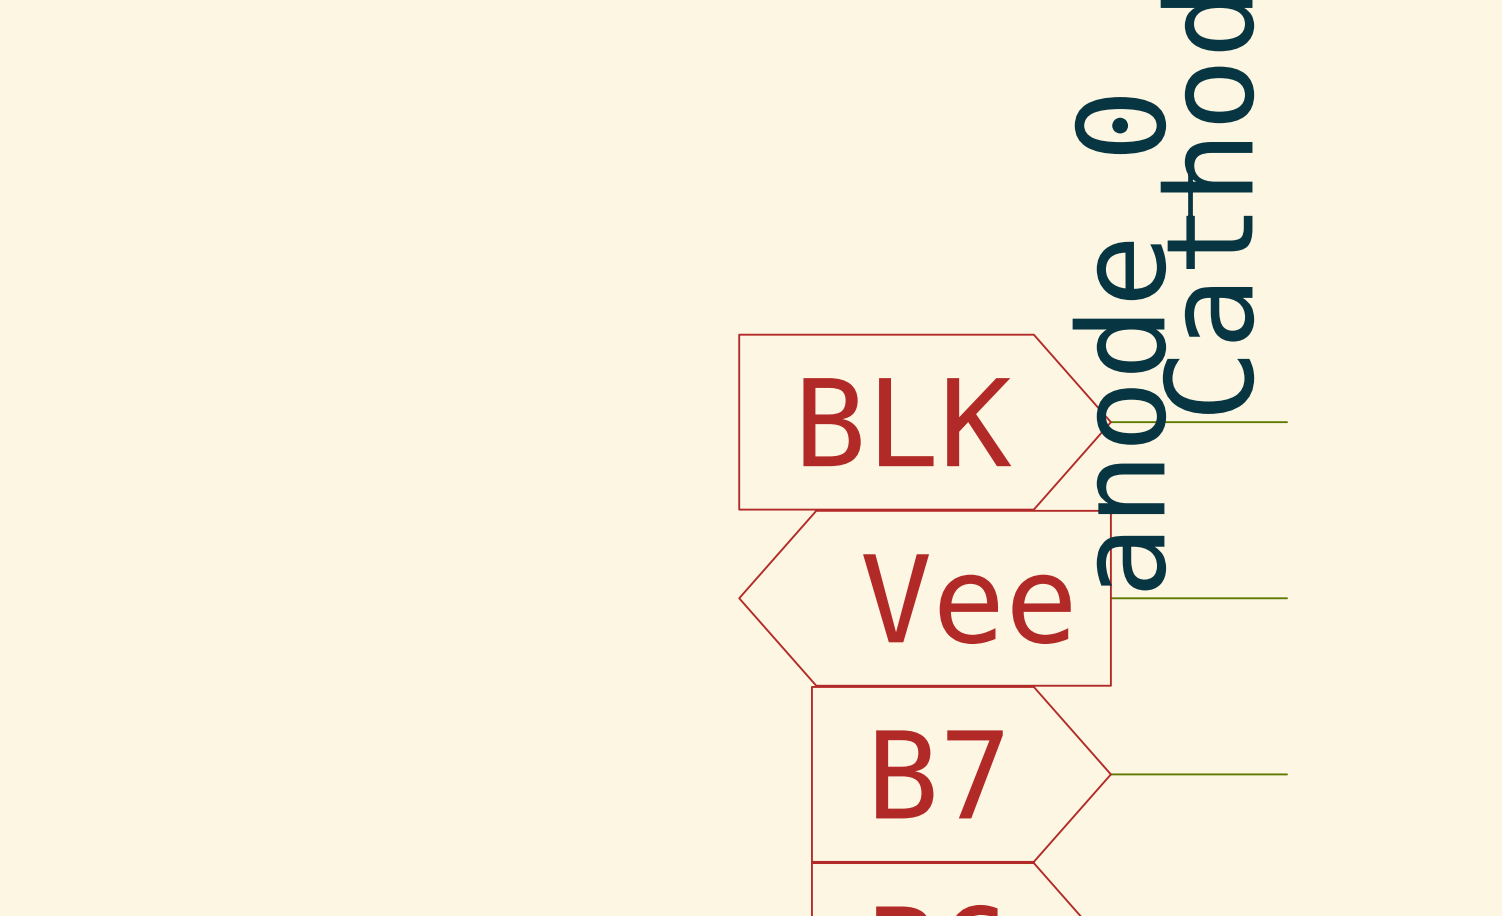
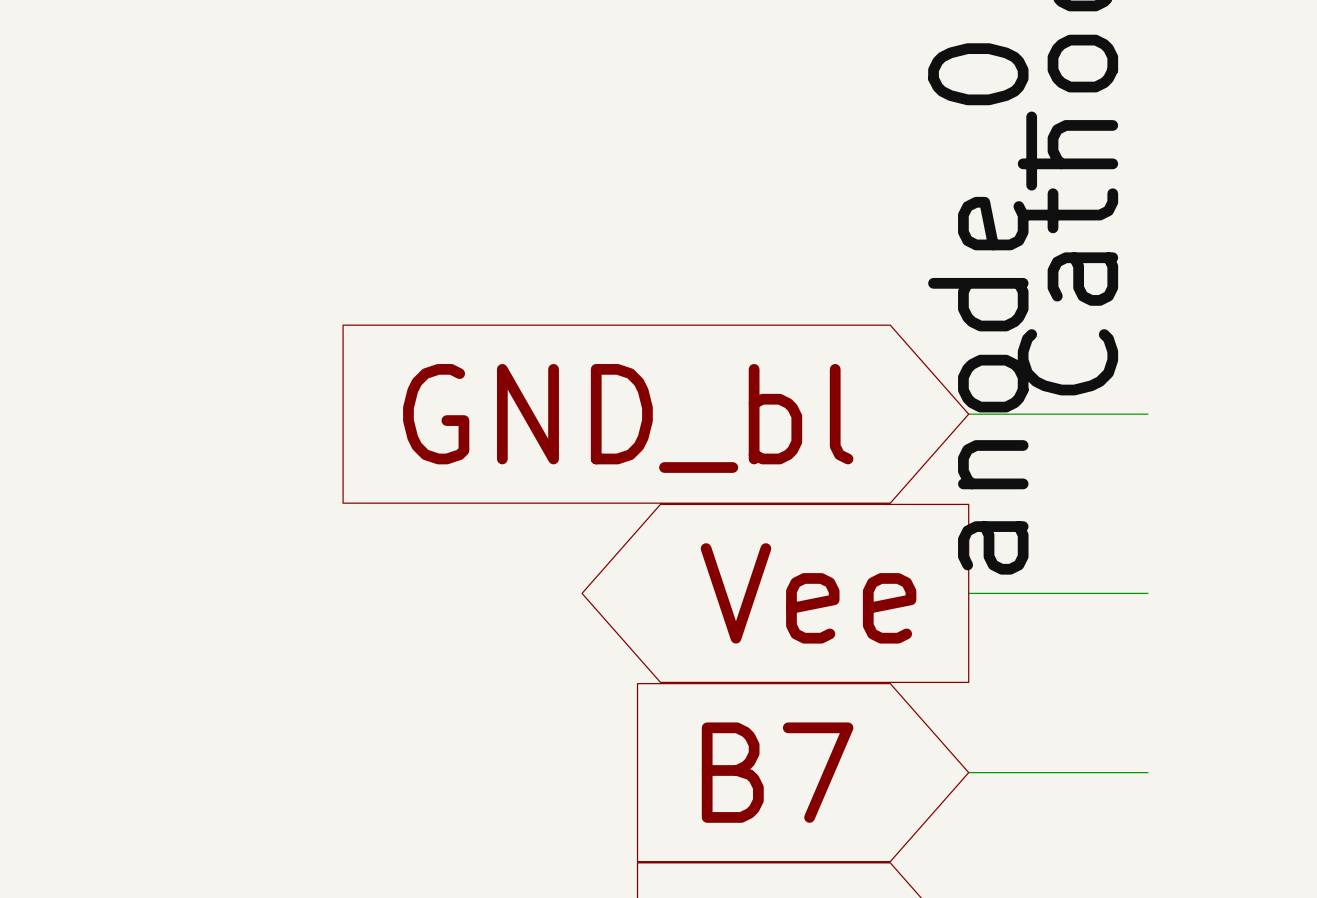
global label: BLK (907, 422) -> GND_bl (628, 418)

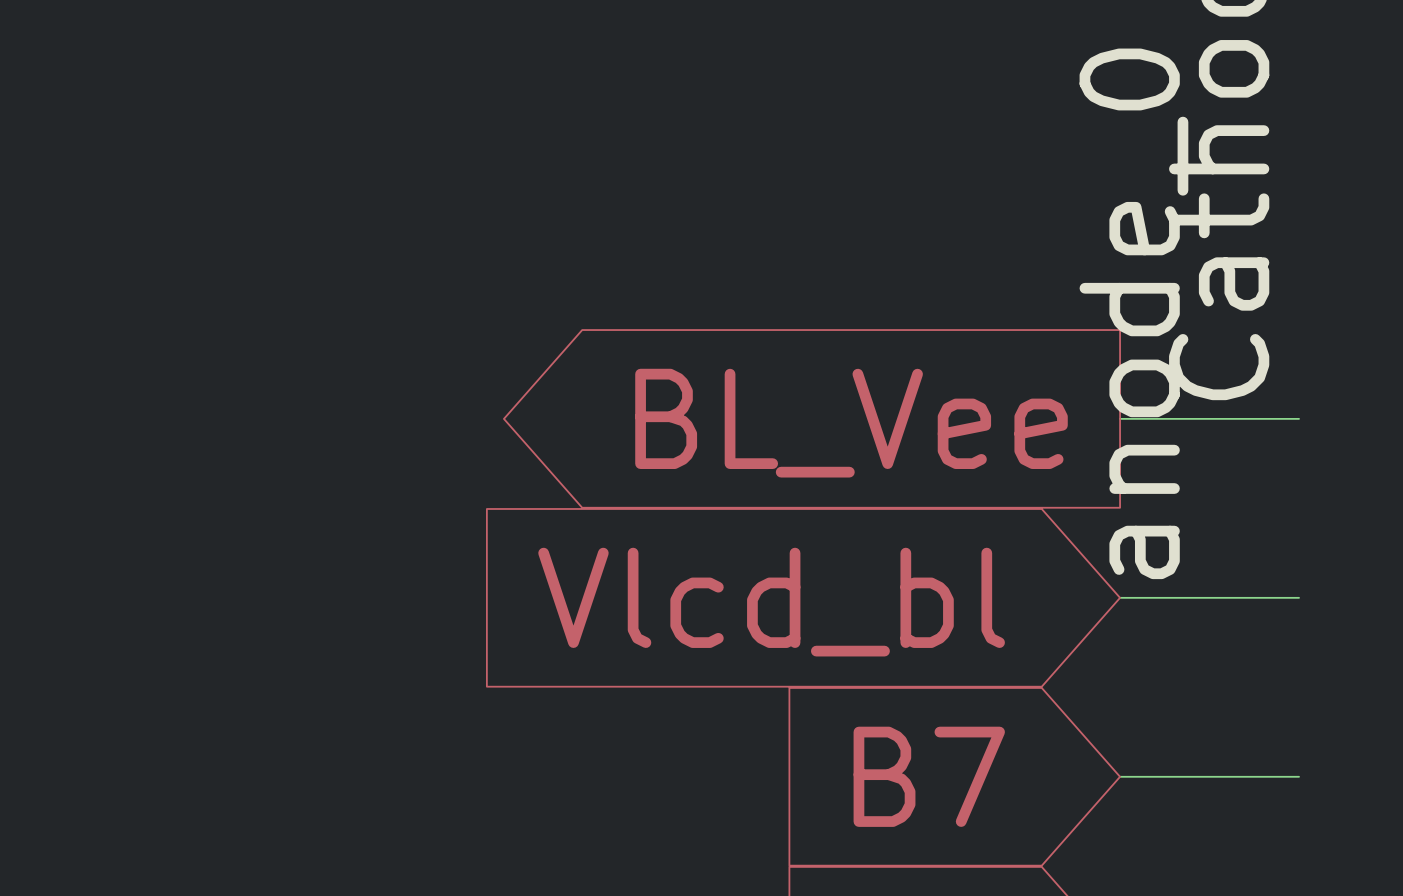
global label shape: input (628, 418) -> output (851, 423)
global label: GND_bl (628, 418) -> BL_Vee (851, 423)
global label shape: output (808, 593) -> input (771, 602)
global label: Vee (808, 593) -> Vlcd_bl (771, 602)

